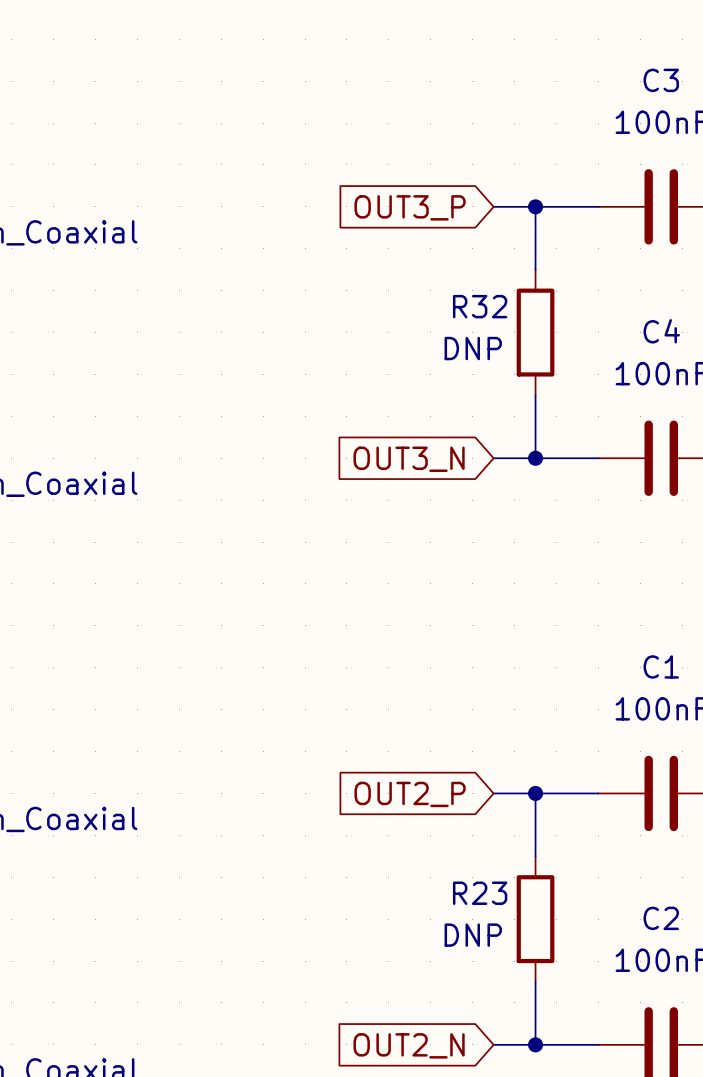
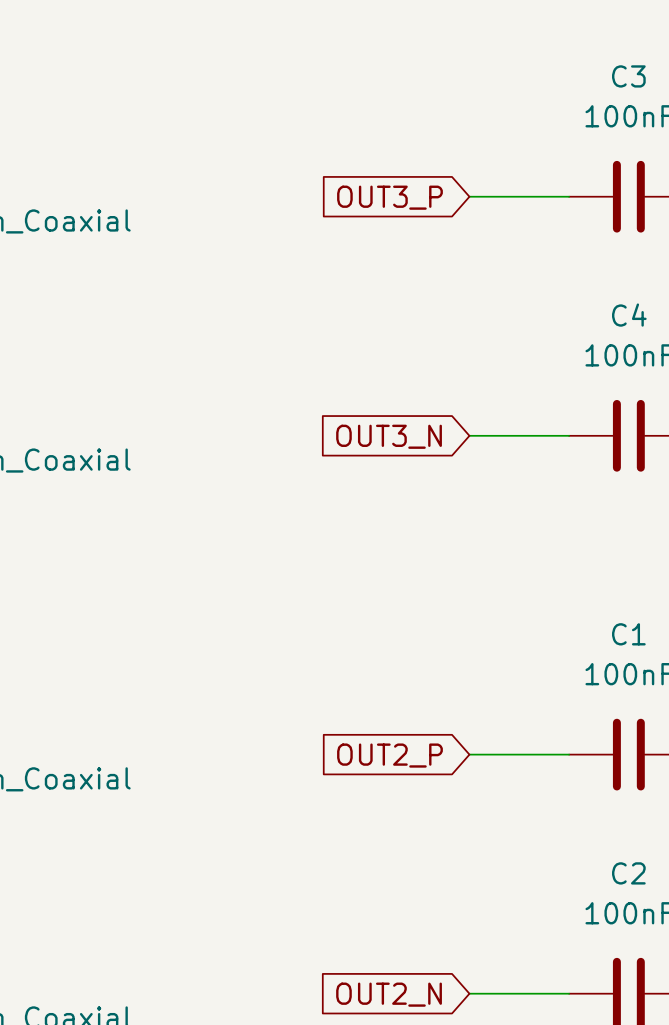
wire: (535, 206) (535, 269) -> none
junction: (535, 206) -> none
R32: DNP (535, 332) -> none
wire: (535, 395) (535, 458) -> none
junction: (535, 458) -> none
wire: (535, 793) (535, 856) -> none
junction: (535, 793) -> none
R23: DNP (535, 919) -> none
wire: (535, 982) (535, 1044) -> none
junction: (535, 1044) -> none

